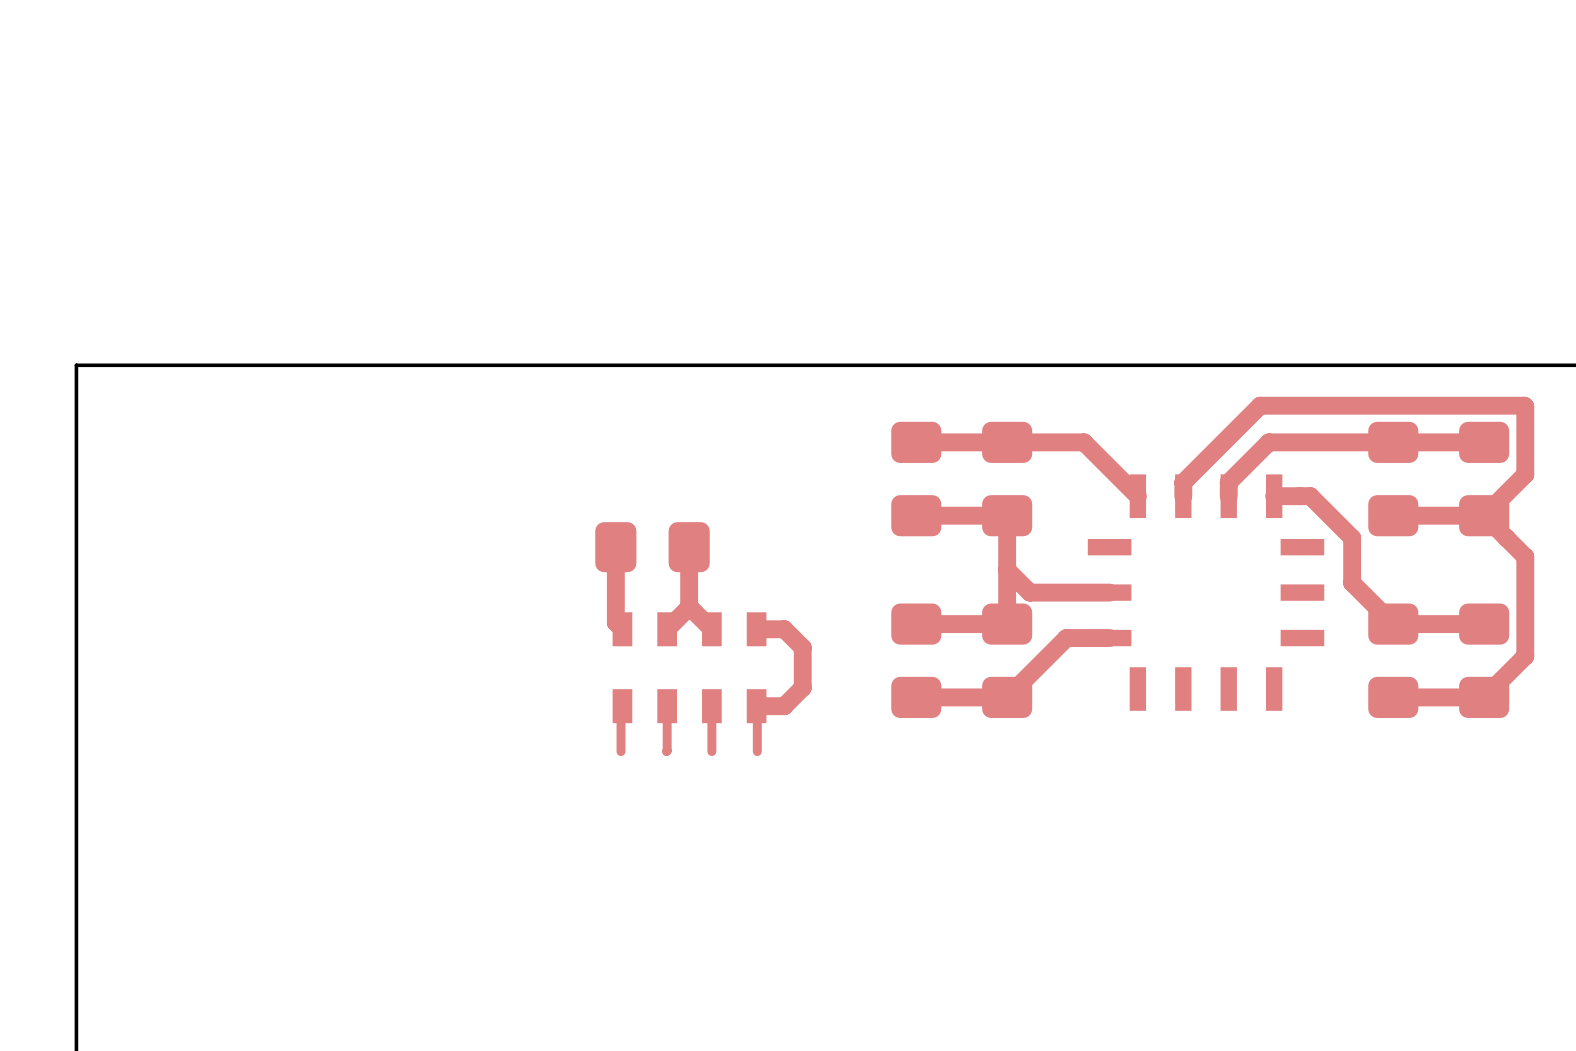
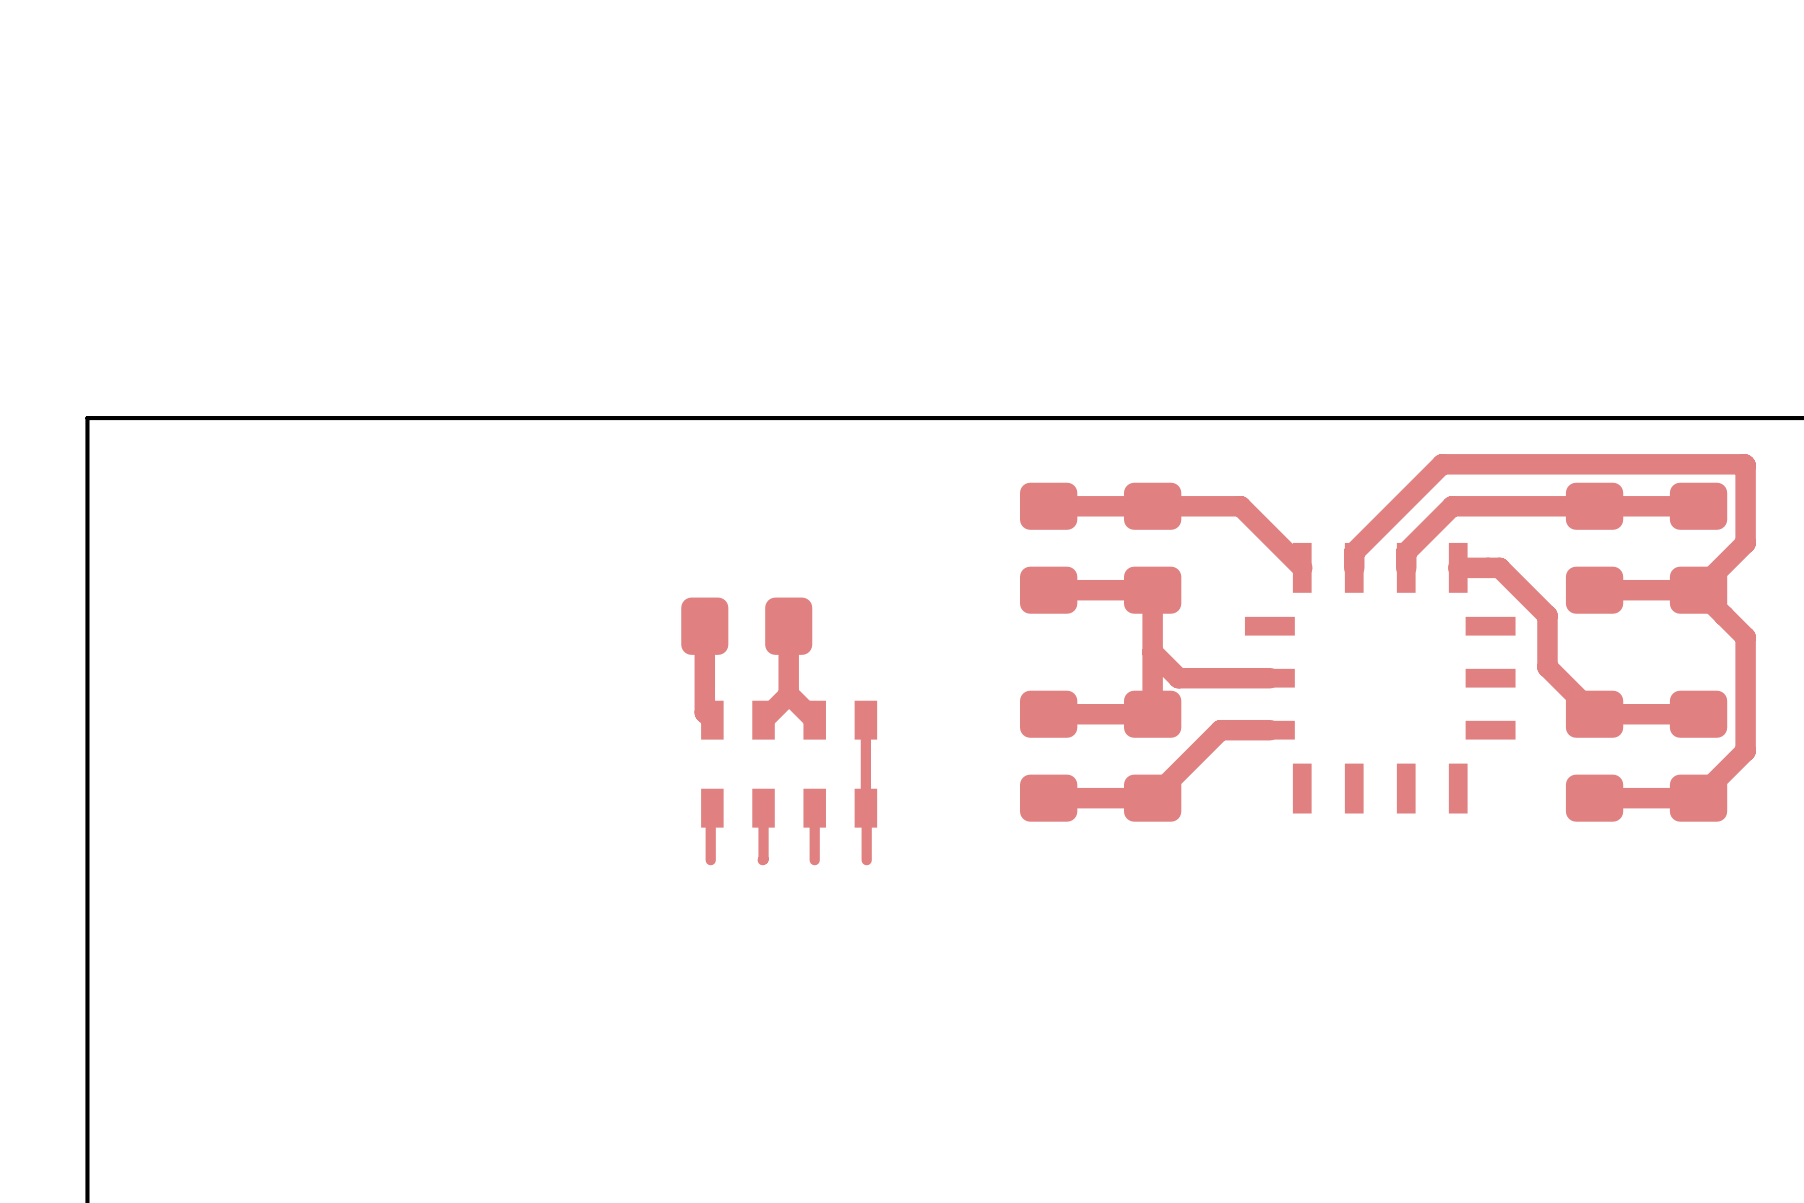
top track: (756, 629) (784, 629) (802, 647) (802, 687) (784, 706) (756, 706) -> (865, 720) (865, 808)

